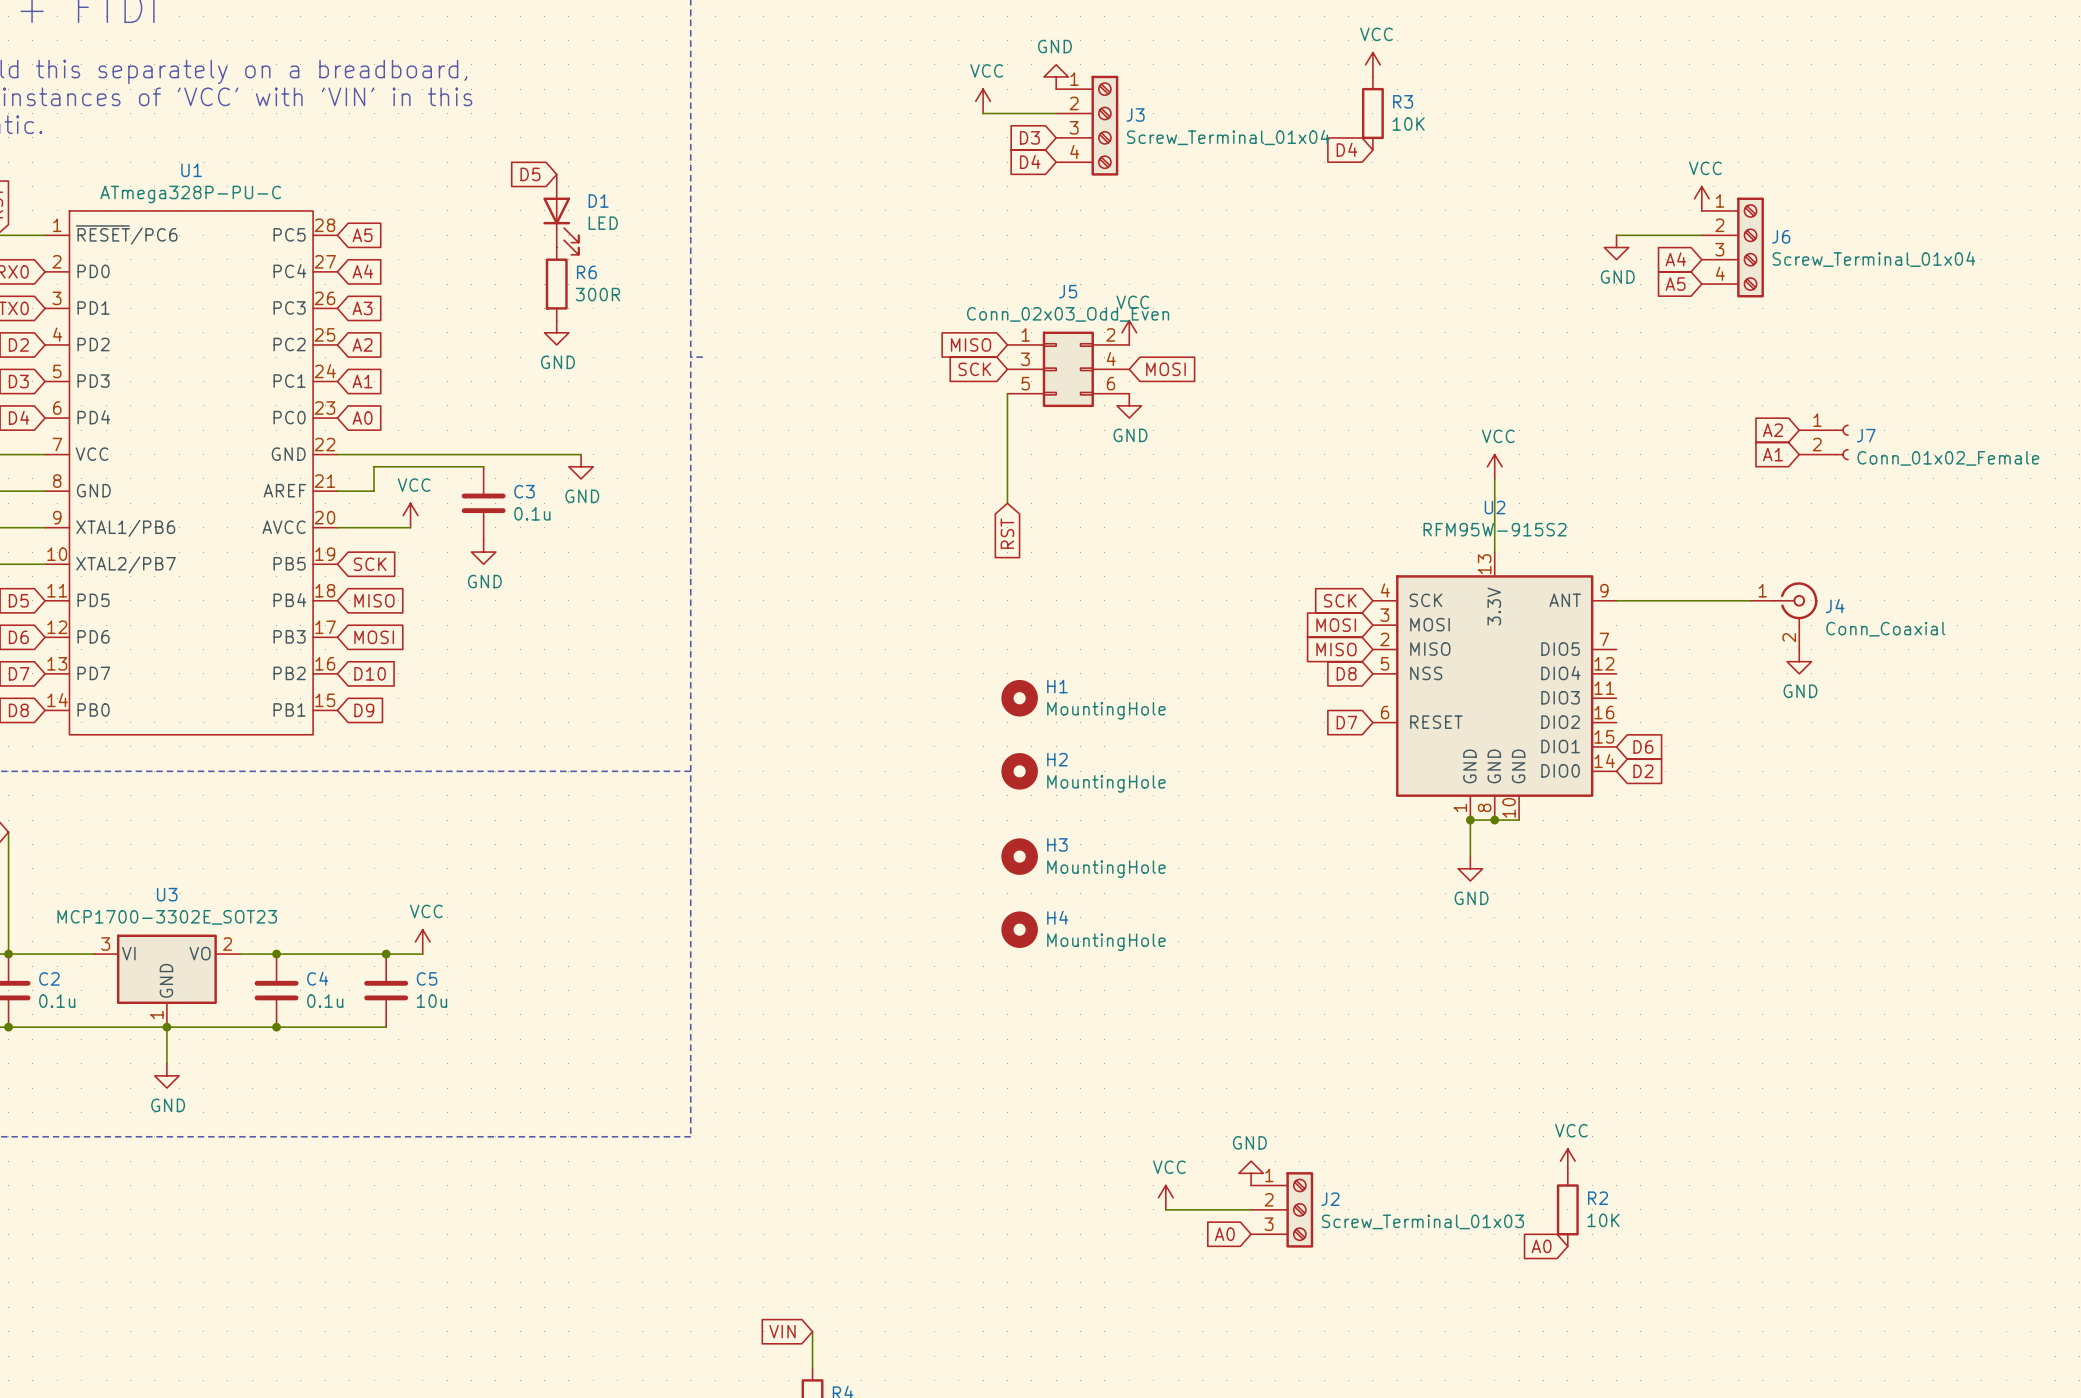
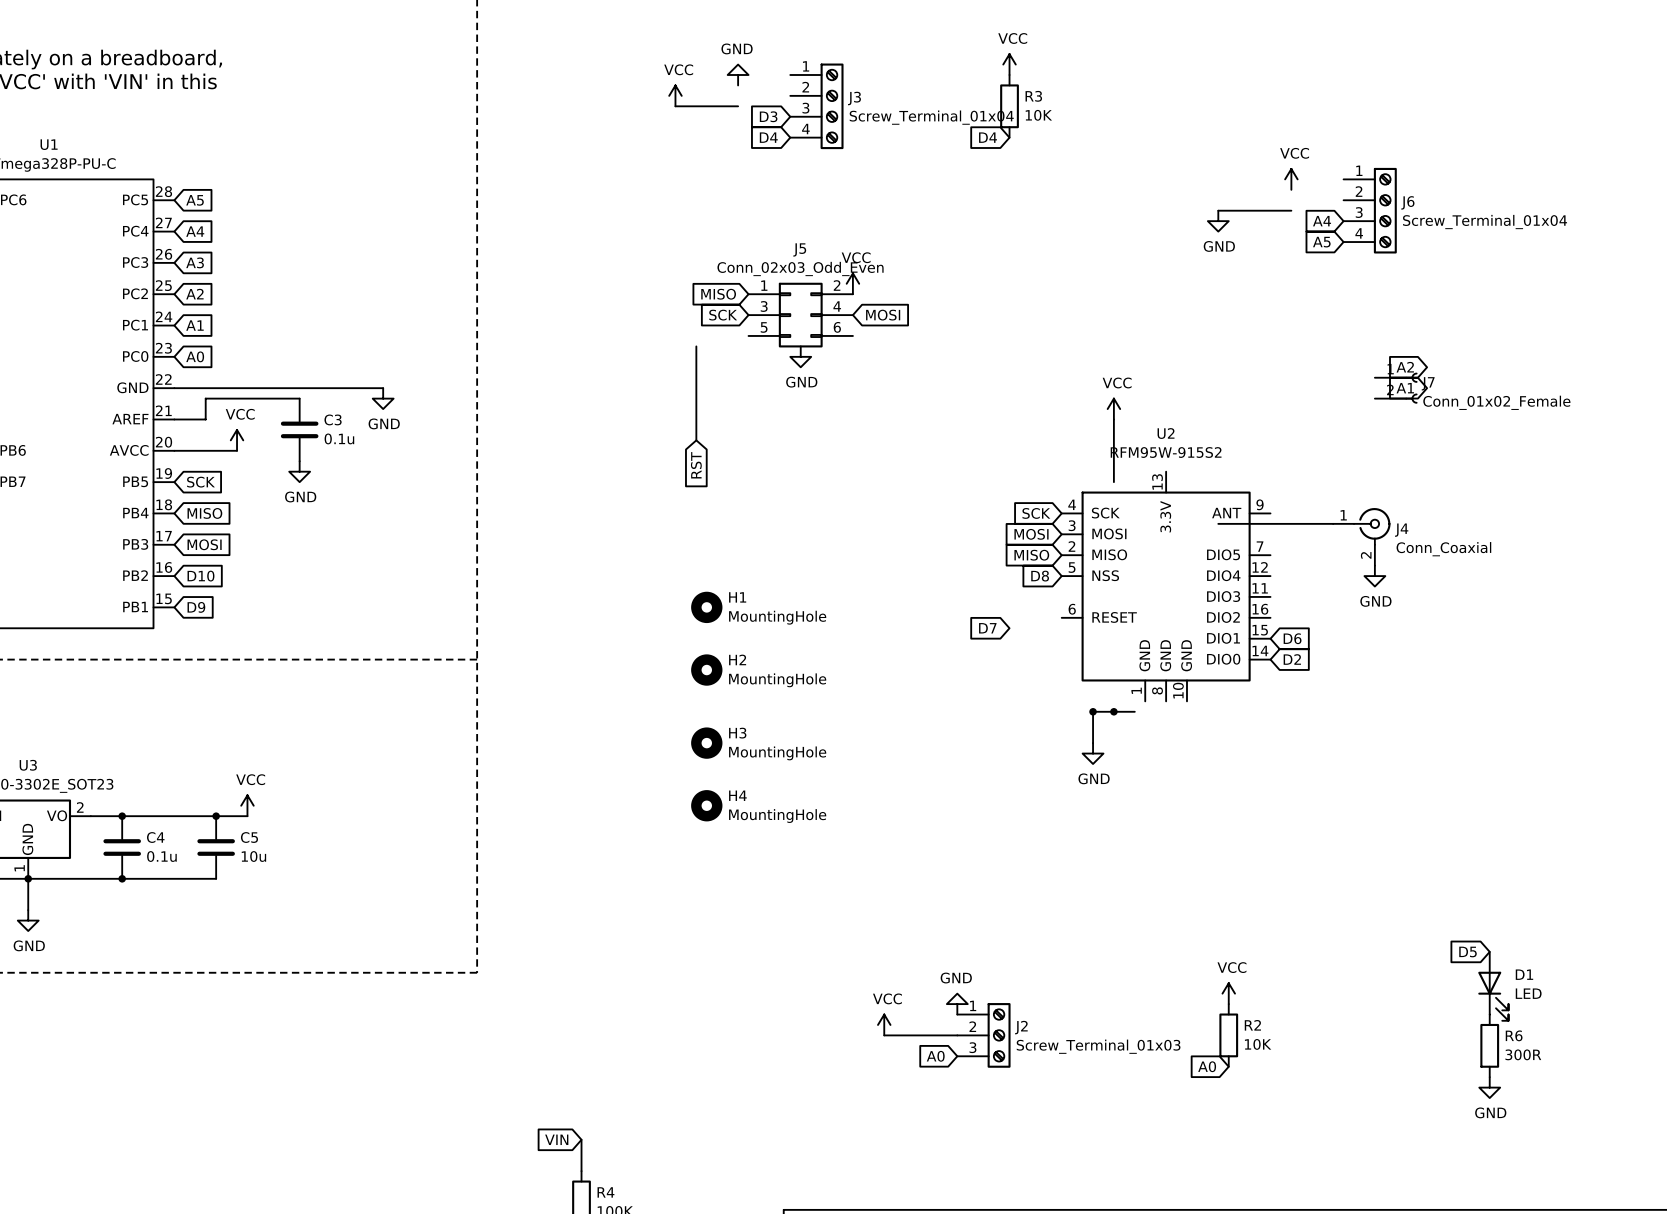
power symbol position: VCC (1372, 64) -> VCC (1009, 64)
power symbol position: GND (1056, 76) -> GND (738, 74)
power symbol position: VCC (983, 101) -> VCC (675, 95)
wire: (983, 113) (1056, 113) -> (675, 106) (738, 106)
R3 position: (1372, 113) -> (1009, 106)
global label position: D4 (1346, 149) -> D4 (988, 137)
global label: D5 (530, 174) -> none
power symbol position: VCC (1701, 198) -> VCC (1291, 179)
D1 position: (560, 214) -> (1493, 986)
wire: (1616, 235) (1701, 235) -> (1218, 210) (1291, 210)
power symbol position: GND (1616, 247) -> GND (1218, 221)
R6 position: (556, 284) -> (1489, 1045)
power symbol: GND (556, 332) -> none
line: (690, 357) (702, 357) -> none
wire: (1007, 393) (1007, 503) -> (696, 346) (696, 440)
power symbol position: GND (1129, 405) -> GND (800, 356)
J7 position: (1823, 442) -> (1396, 388)
power symbol position: VCC (1494, 466) -> VCC (1113, 409)
wire: (1494, 478) (1494, 552) -> (1113, 419) (1113, 482)
global label position: RST (1007, 533) -> RST (696, 465)
wire: (1616, 600) (1750, 600) -> (1218, 523) (1333, 523)
J4 position: (1784, 615) -> (1361, 536)
power symbol position: GND (1799, 661) -> GND (1374, 576)
H1 position: (1019, 698) -> (706, 607)
global label position: D7 (1346, 722) -> D7 (987, 628)
H2 position: (1019, 771) -> (706, 670)
junction: (1470, 820) -> none
junction: (1494, 820) -> none
wire: (1519, 820) (1470, 820) (1470, 856) -> (1134, 711) (1093, 711) (1093, 743)
junction: none -> (1093, 711)
junction: none -> (1113, 711)
H3 position: (1019, 856) -> (706, 743)
power symbol position: GND (1470, 868) -> GND (1093, 753)
H4 position: (1019, 929) -> (706, 805)
global label: none -> D5 (1467, 951)
power symbol: none -> GND (1489, 1087)

